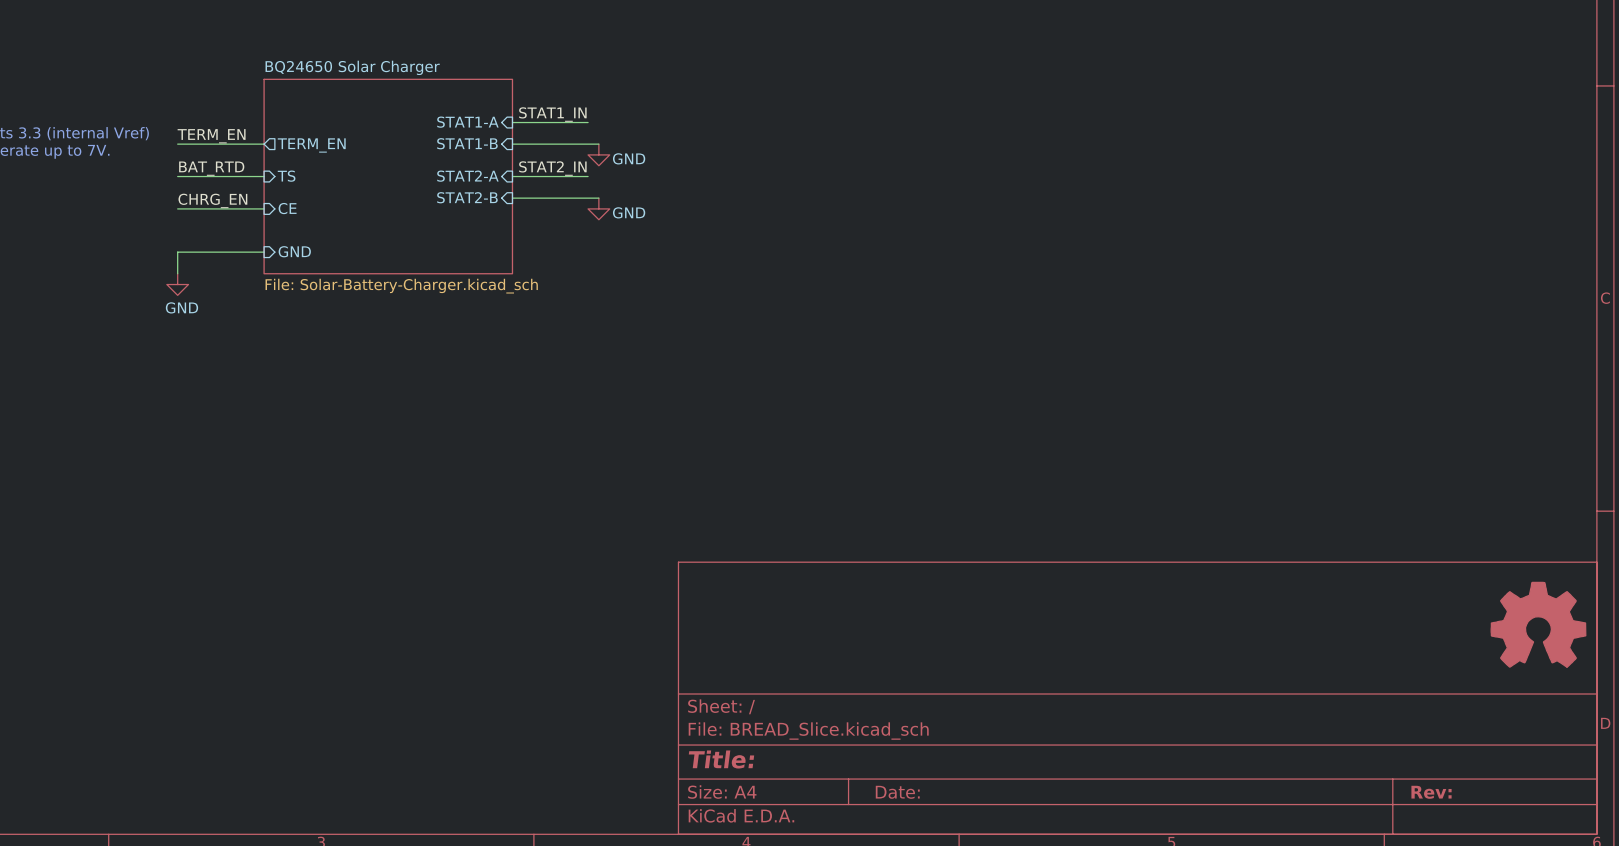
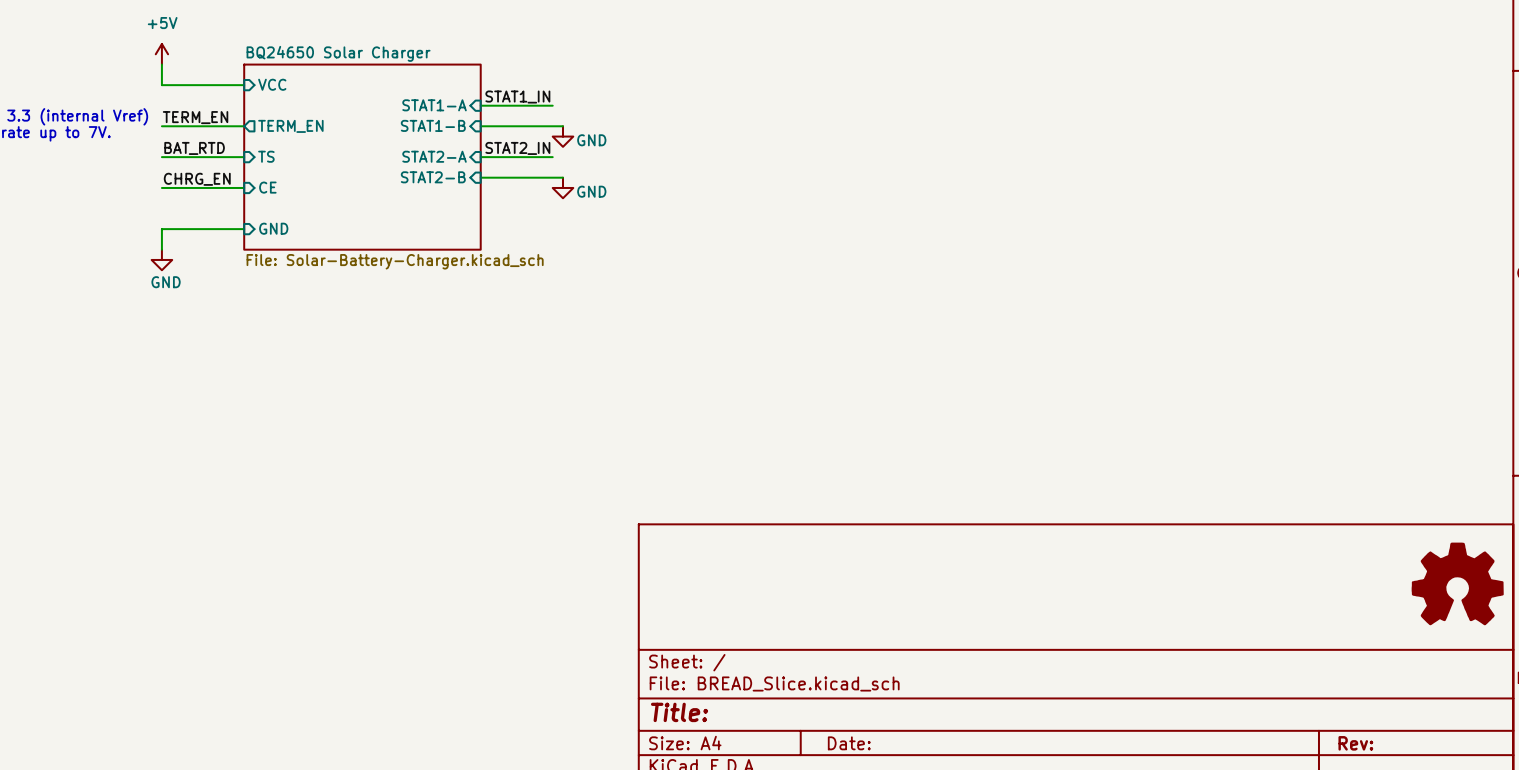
power symbol: none -> +5V (161, 54)
wire: none -> (161, 64) (161, 85) (244, 85)
sheet pin: none -> VCC (272, 84)

